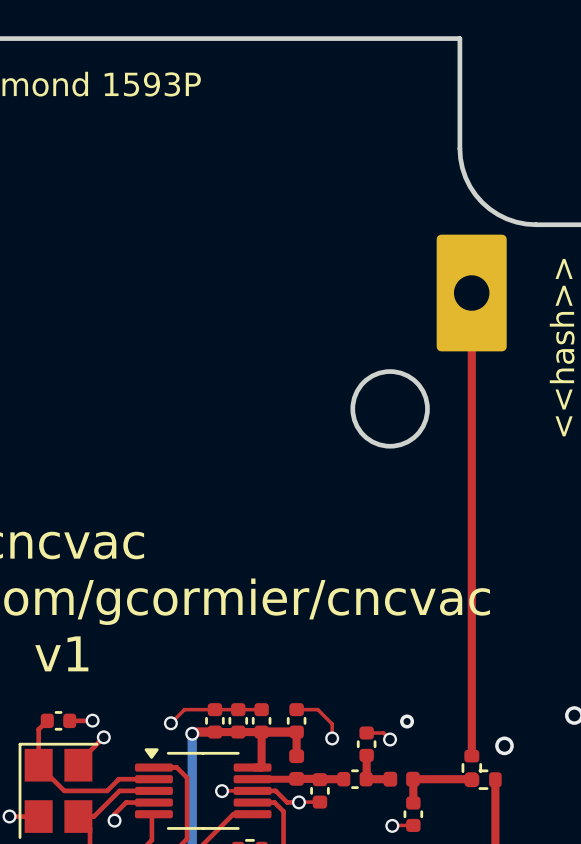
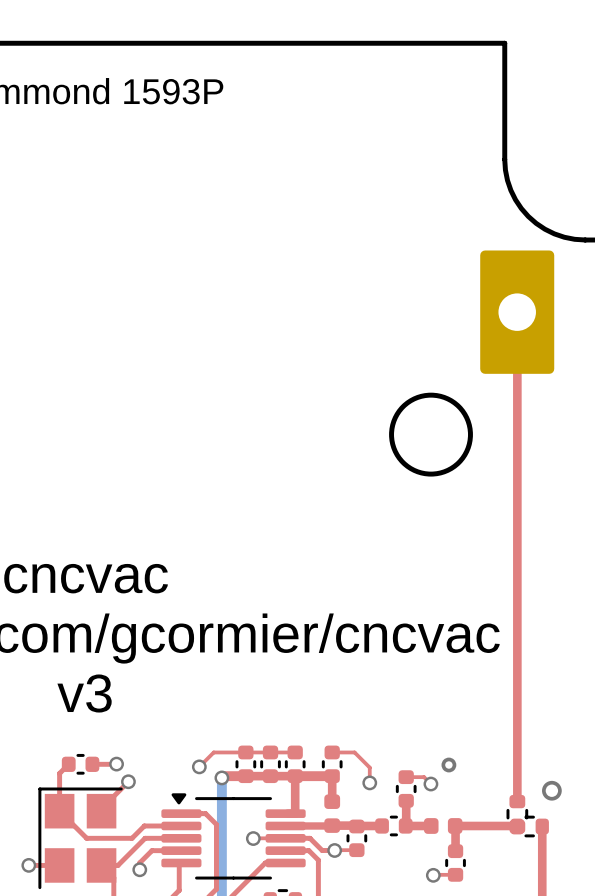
text: v1 (61, 653) -> v3 (84, 693)

